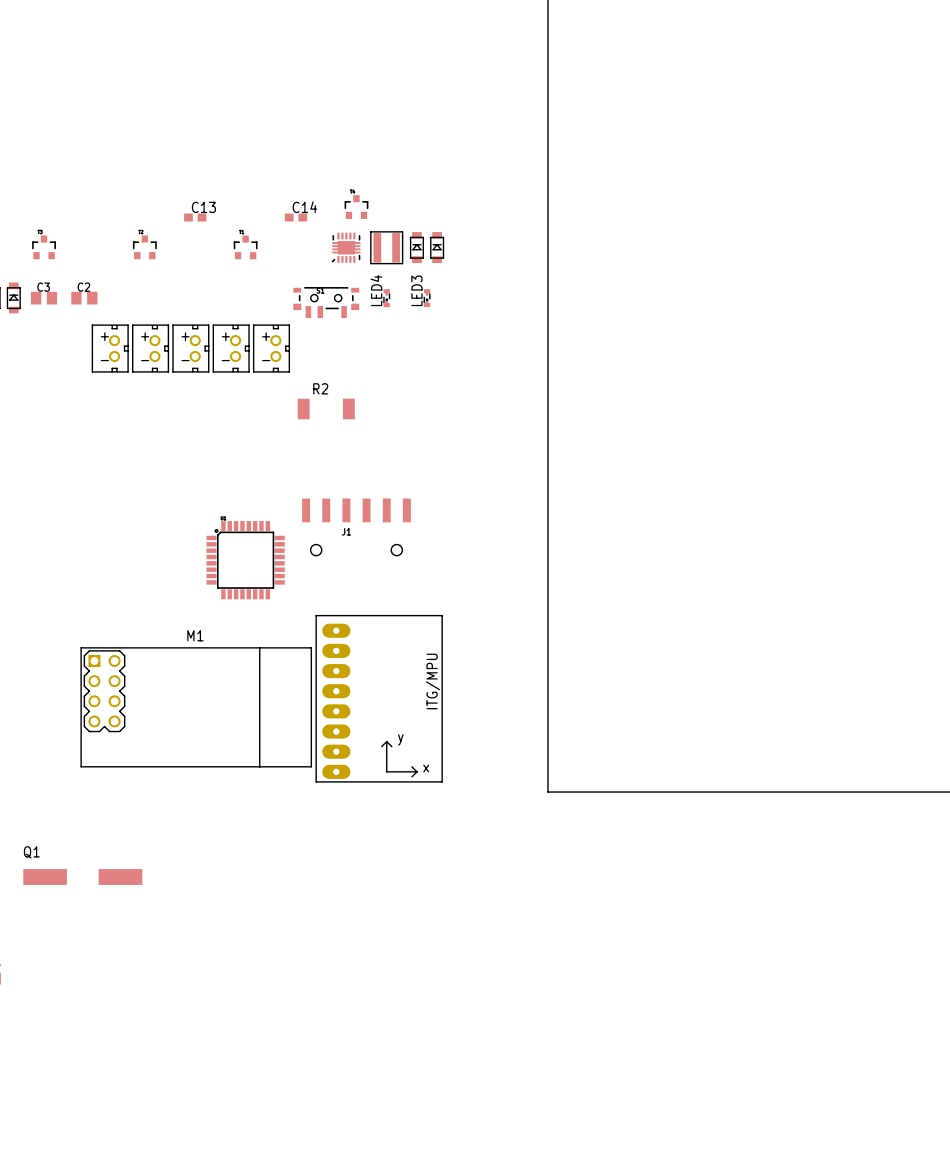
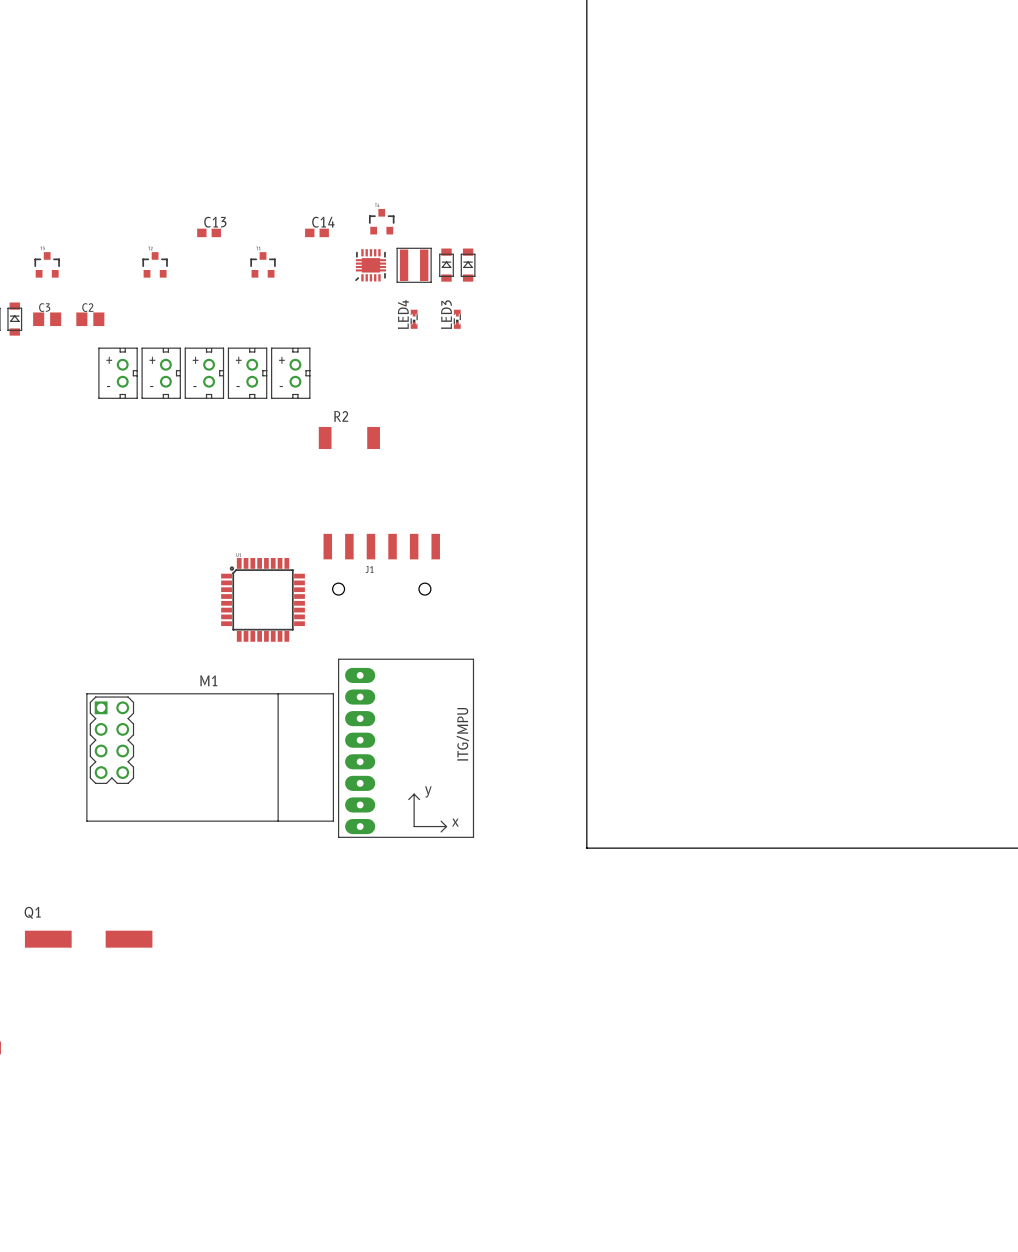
part: (326, 302) -> none

